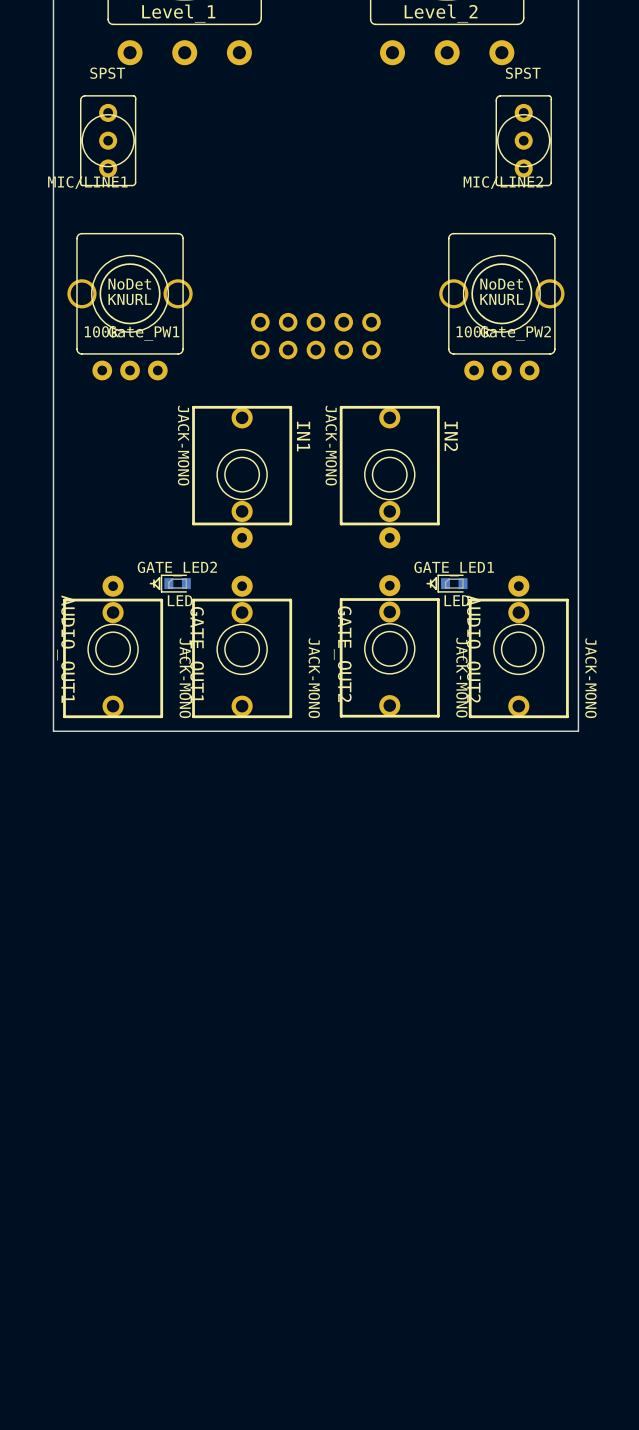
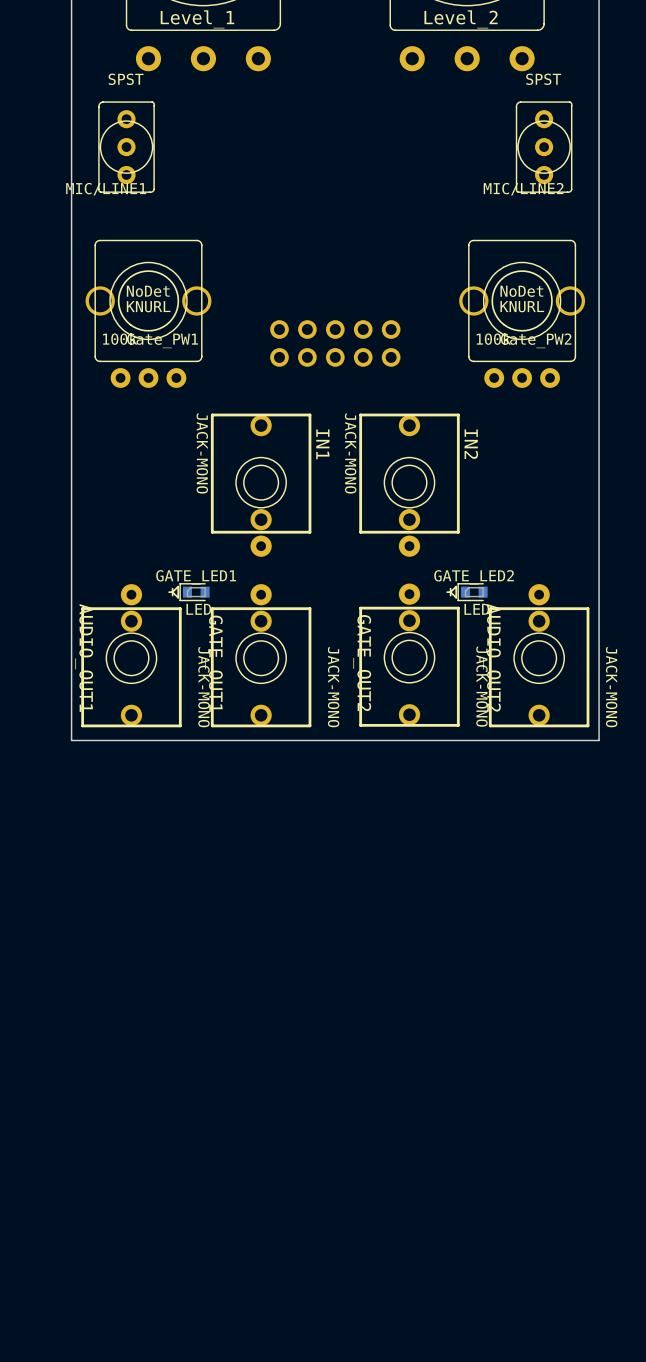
GATE_LED2 name: GATE_LED2 (177, 569) -> GATE_LED1 (196, 577)
GATE_LED1 name: GATE_LED1 (454, 569) -> GATE_LED2 (474, 577)

